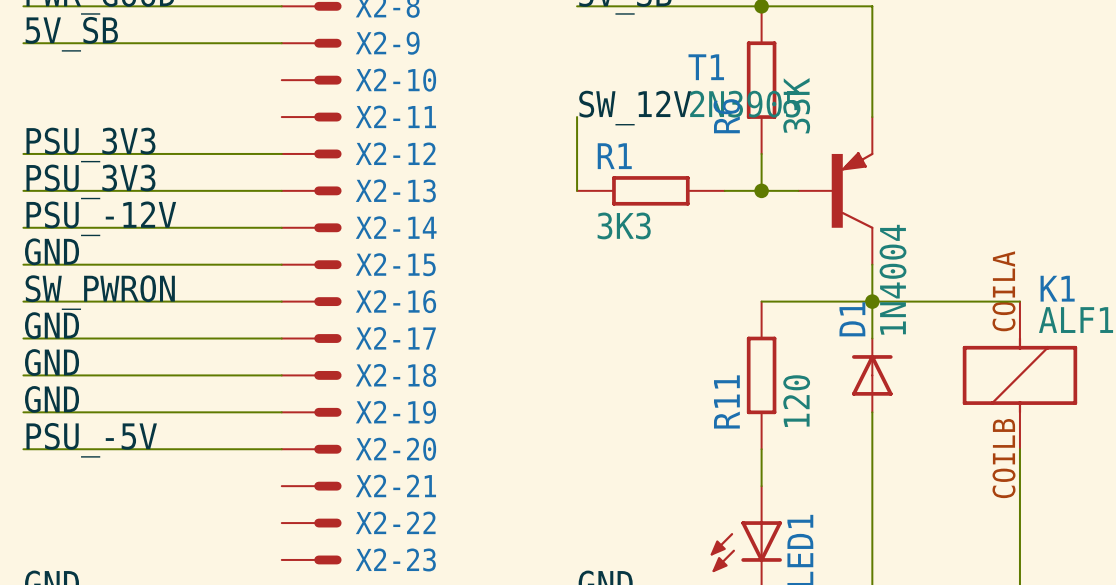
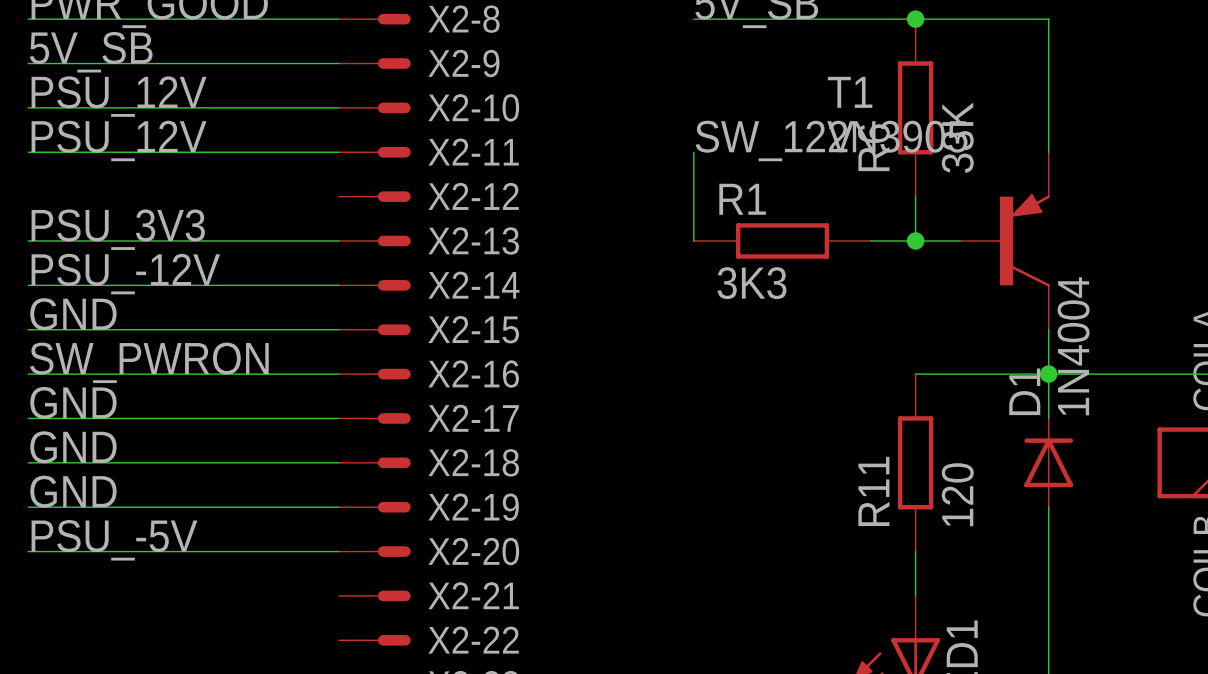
label: none -> PSU_12V (119, 96)
wire: none -> (28, 107) (338, 107)
label: PSU_3V3 (90, 144) -> PSU_12V (119, 140)
wire: (23, 153) (281, 153) -> (28, 152) (338, 152)

